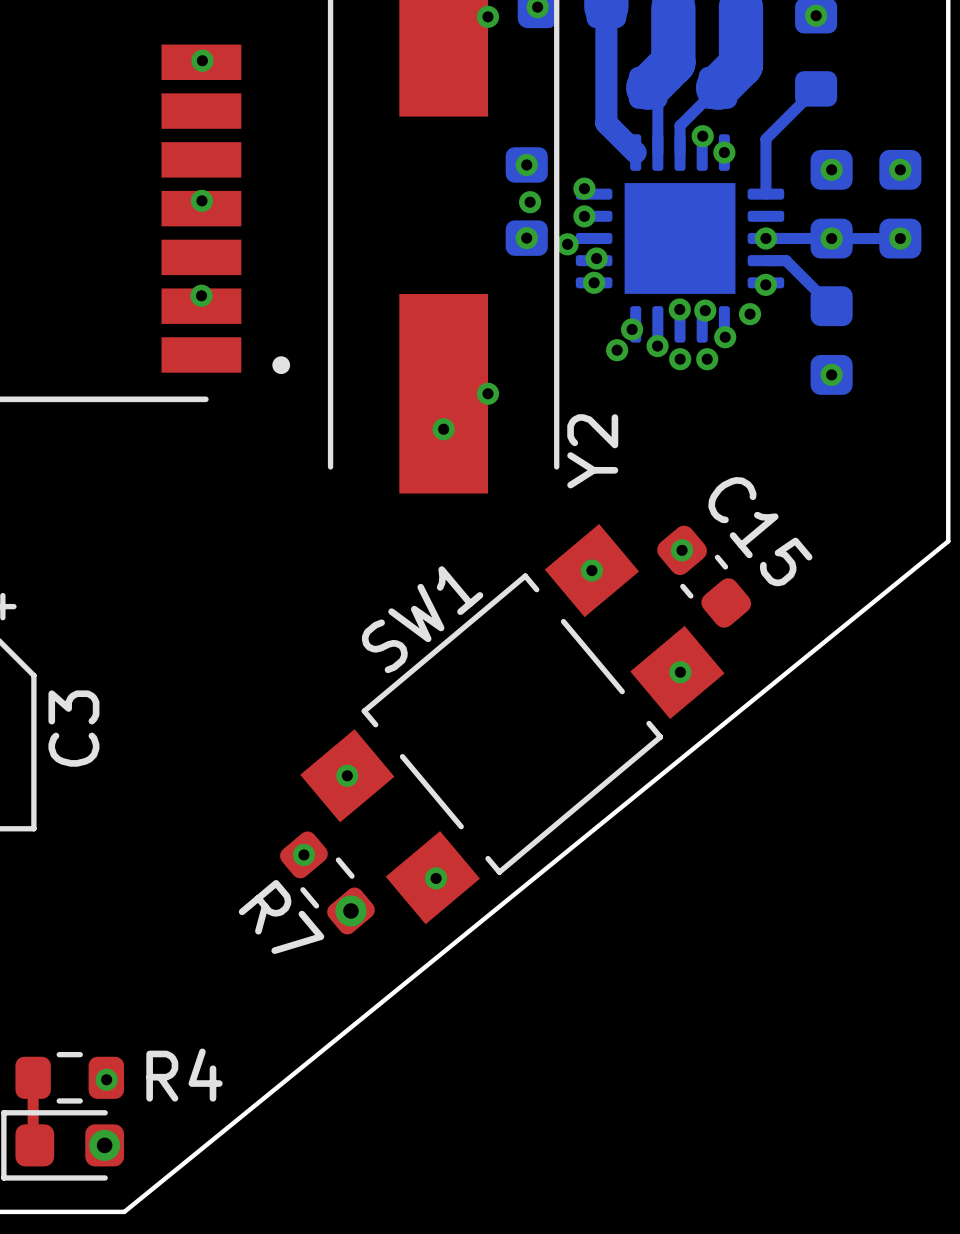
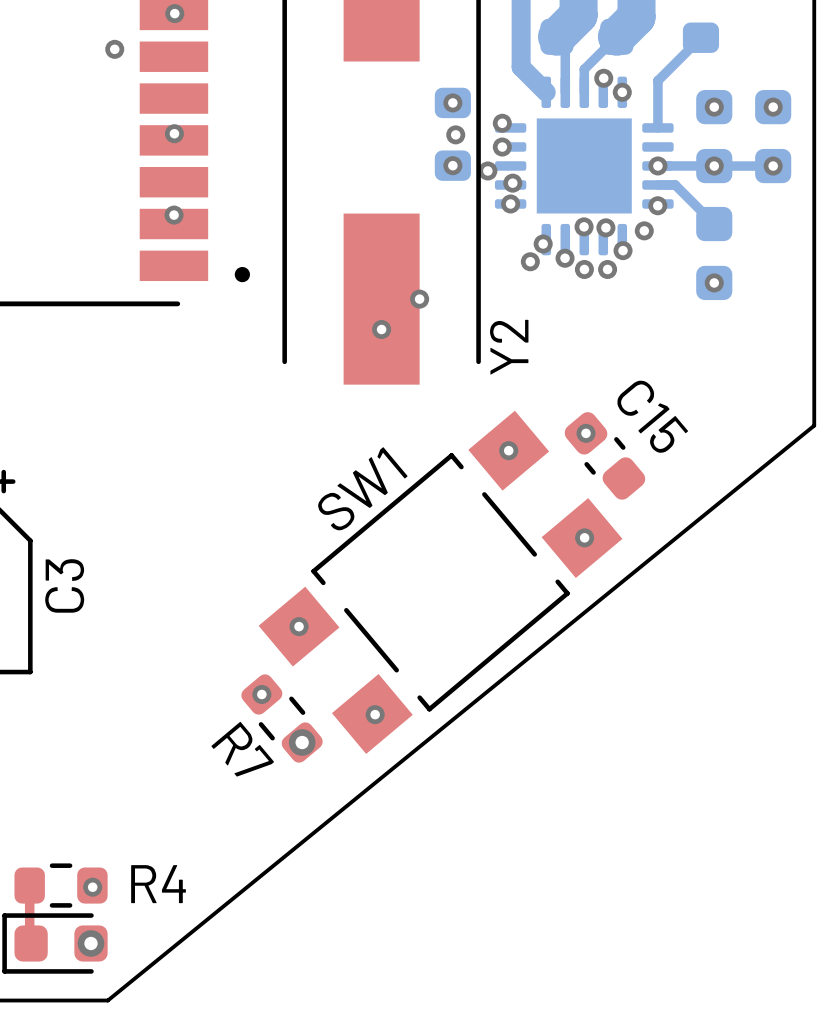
via: none -> (114, 49)

